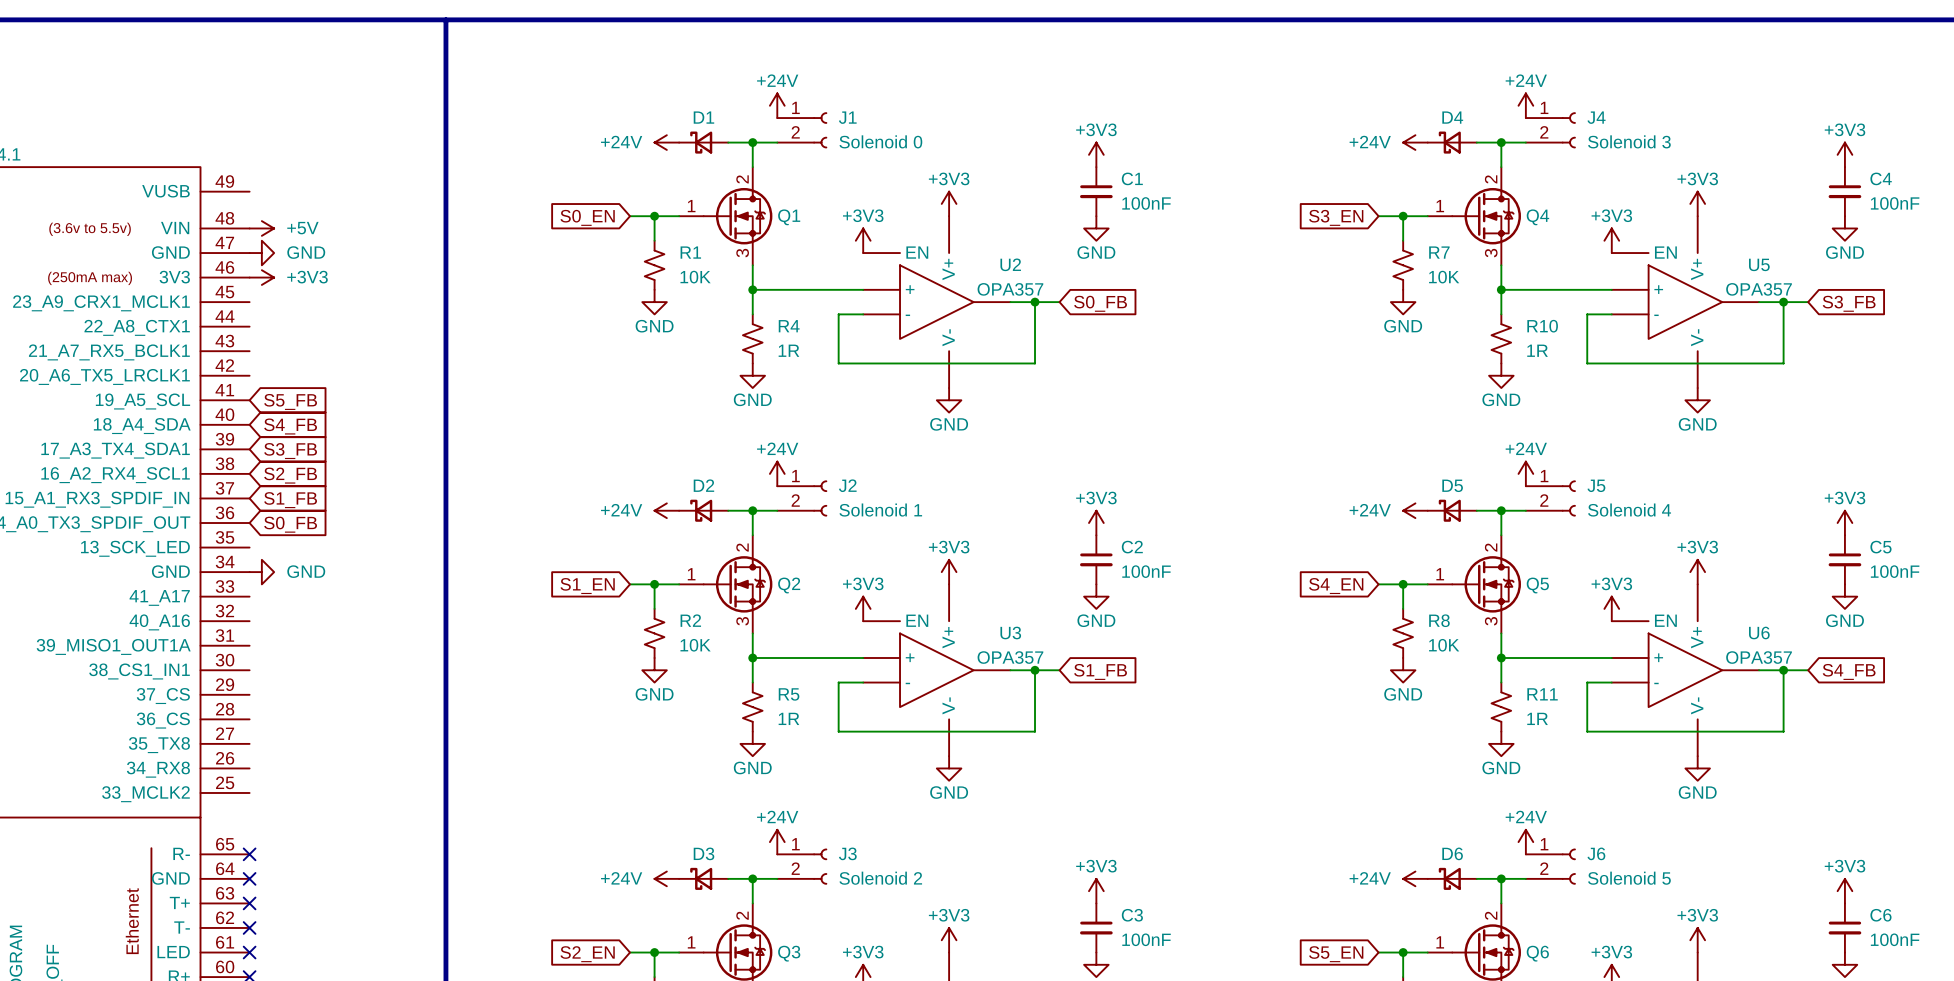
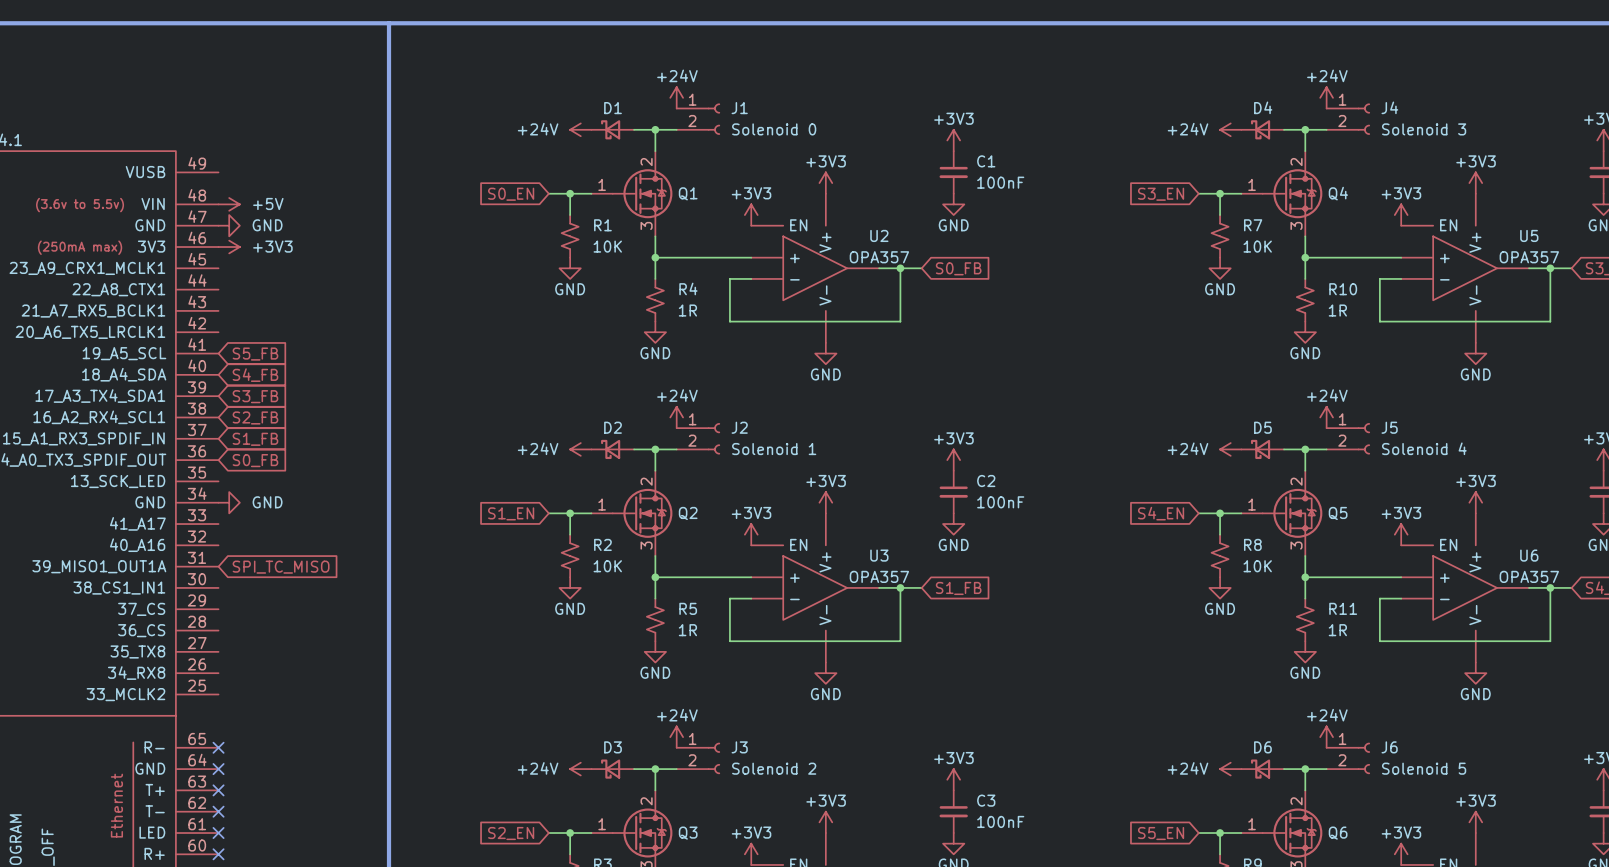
global label: none -> SPI_TC_MISO (281, 567)

